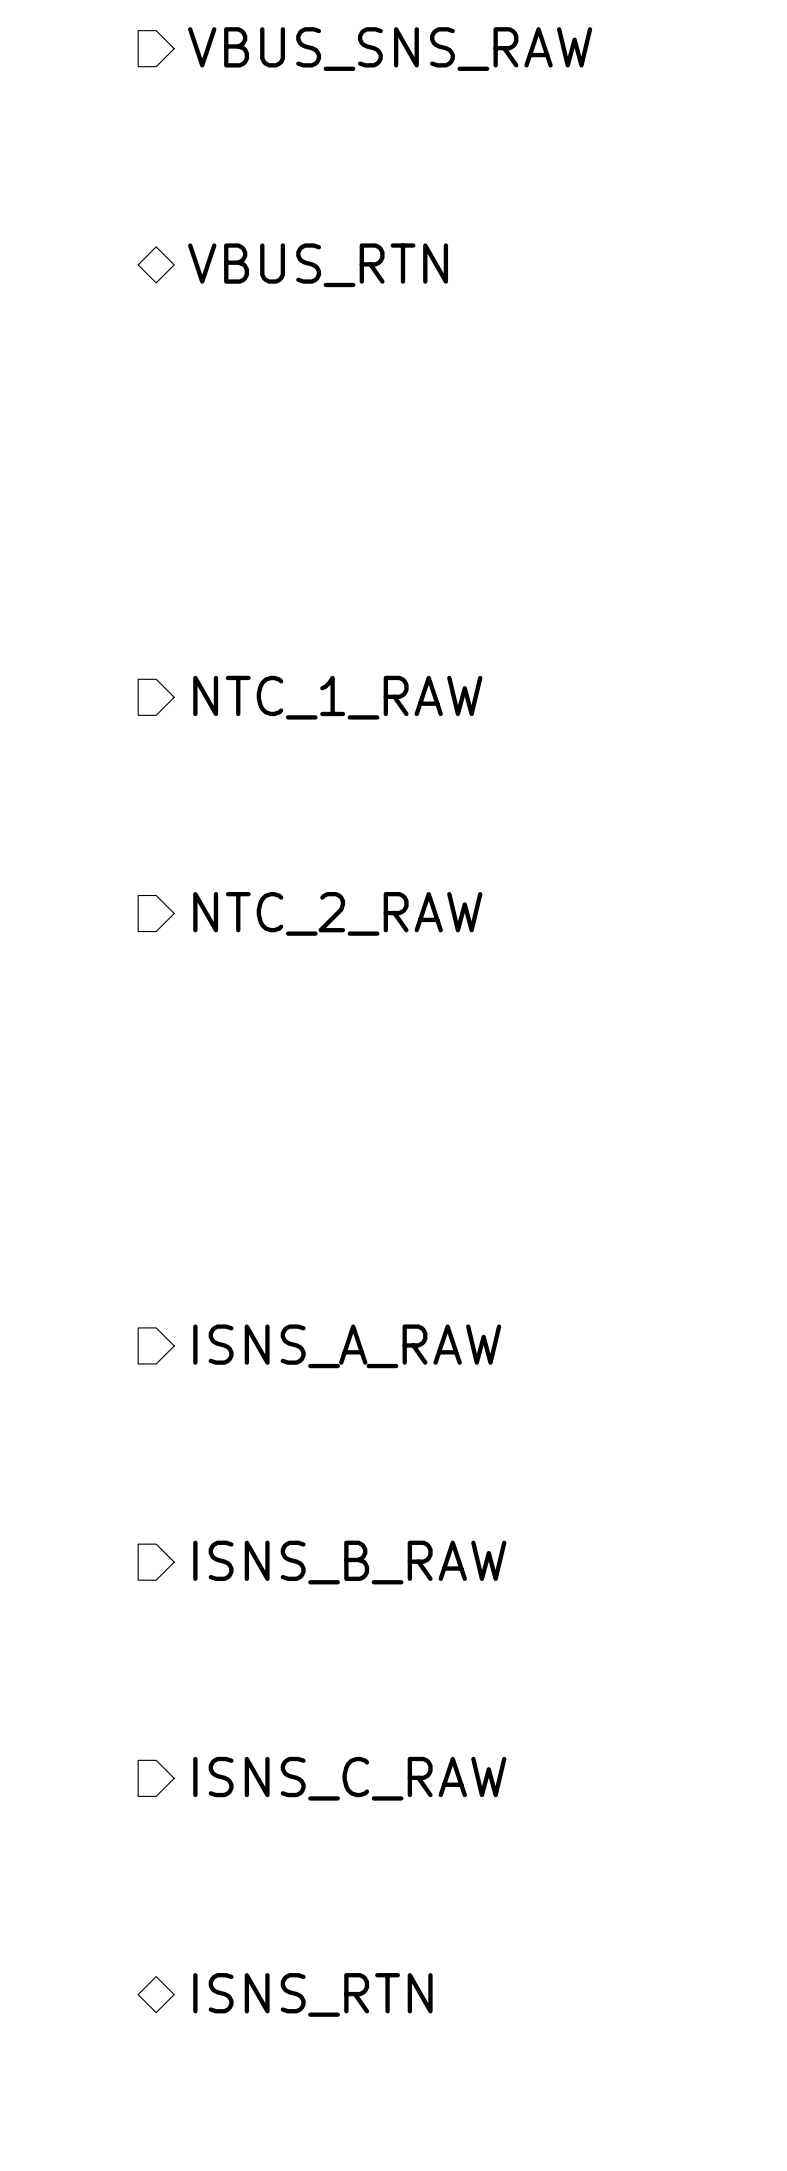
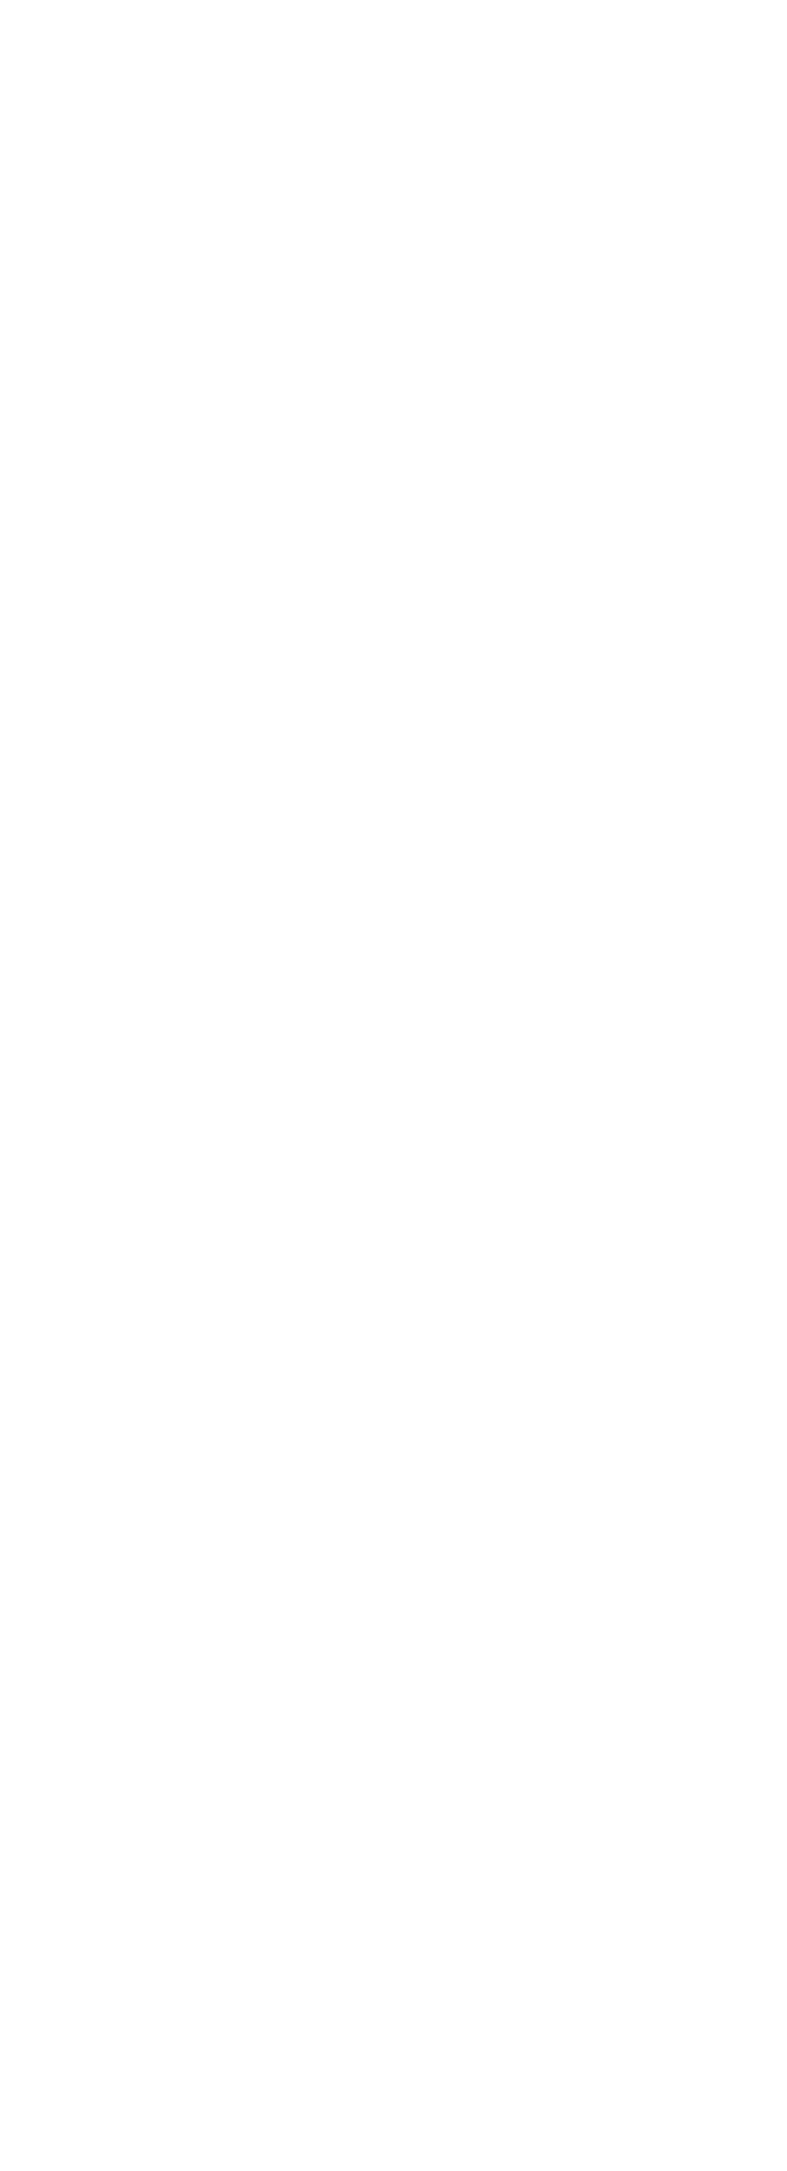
hierarchical label: VBUS_SNS_RAW (390, 49) -> none
hierarchical label: VBUS_RTN (318, 265) -> none
hierarchical label: NTC_1_RAW (337, 697) -> none
hierarchical label: NTC_2_RAW (337, 913) -> none
hierarchical label: ISNS_A_RAW (347, 1346) -> none
hierarchical label: ISNS_B_RAW (349, 1562) -> none
hierarchical label: ISNS_C_RAW (349, 1778) -> none
hierarchical label: ISNS_RTN (312, 1994) -> none

